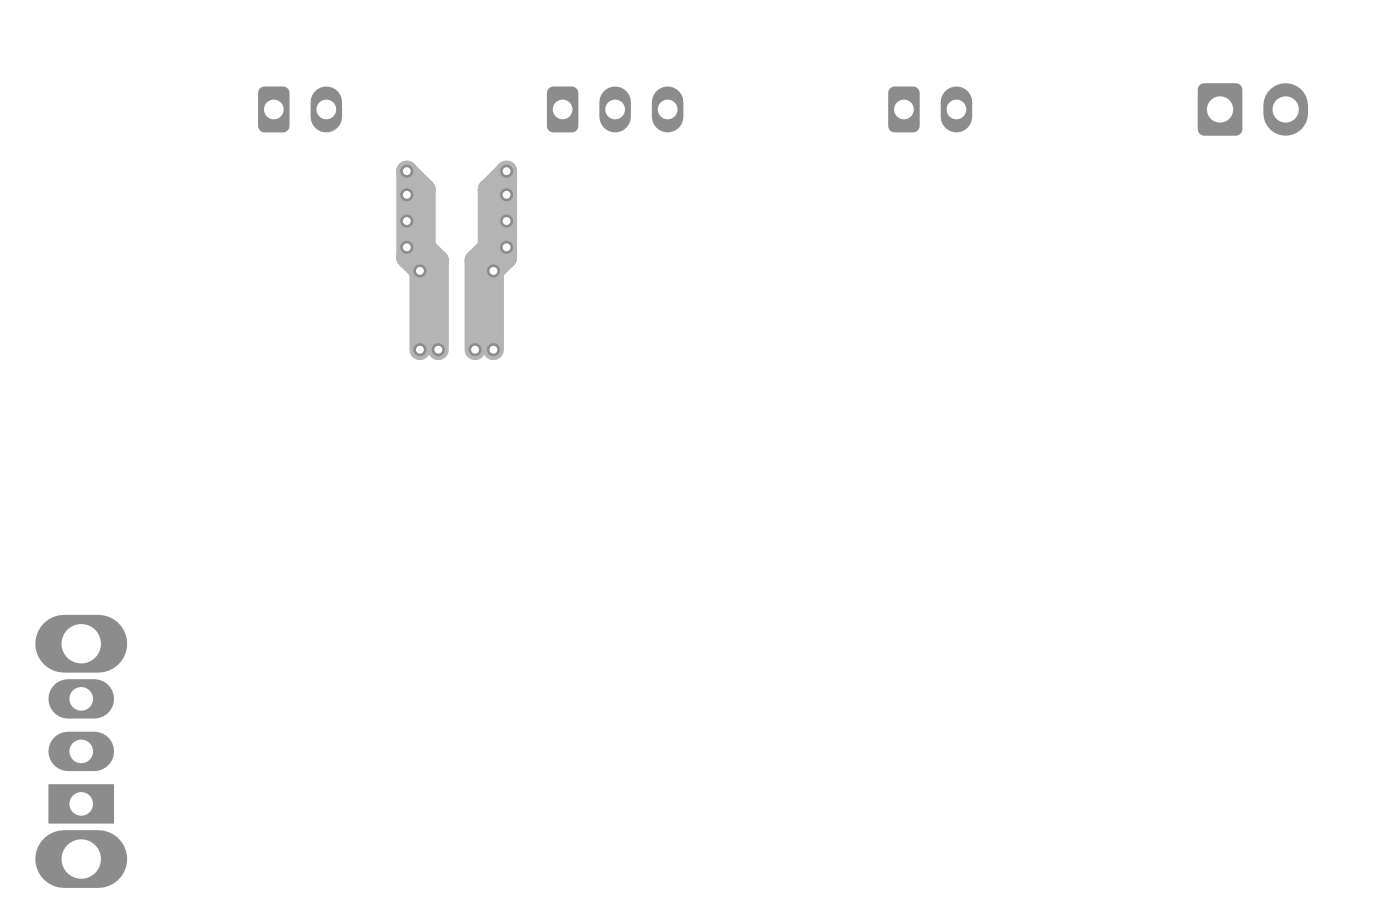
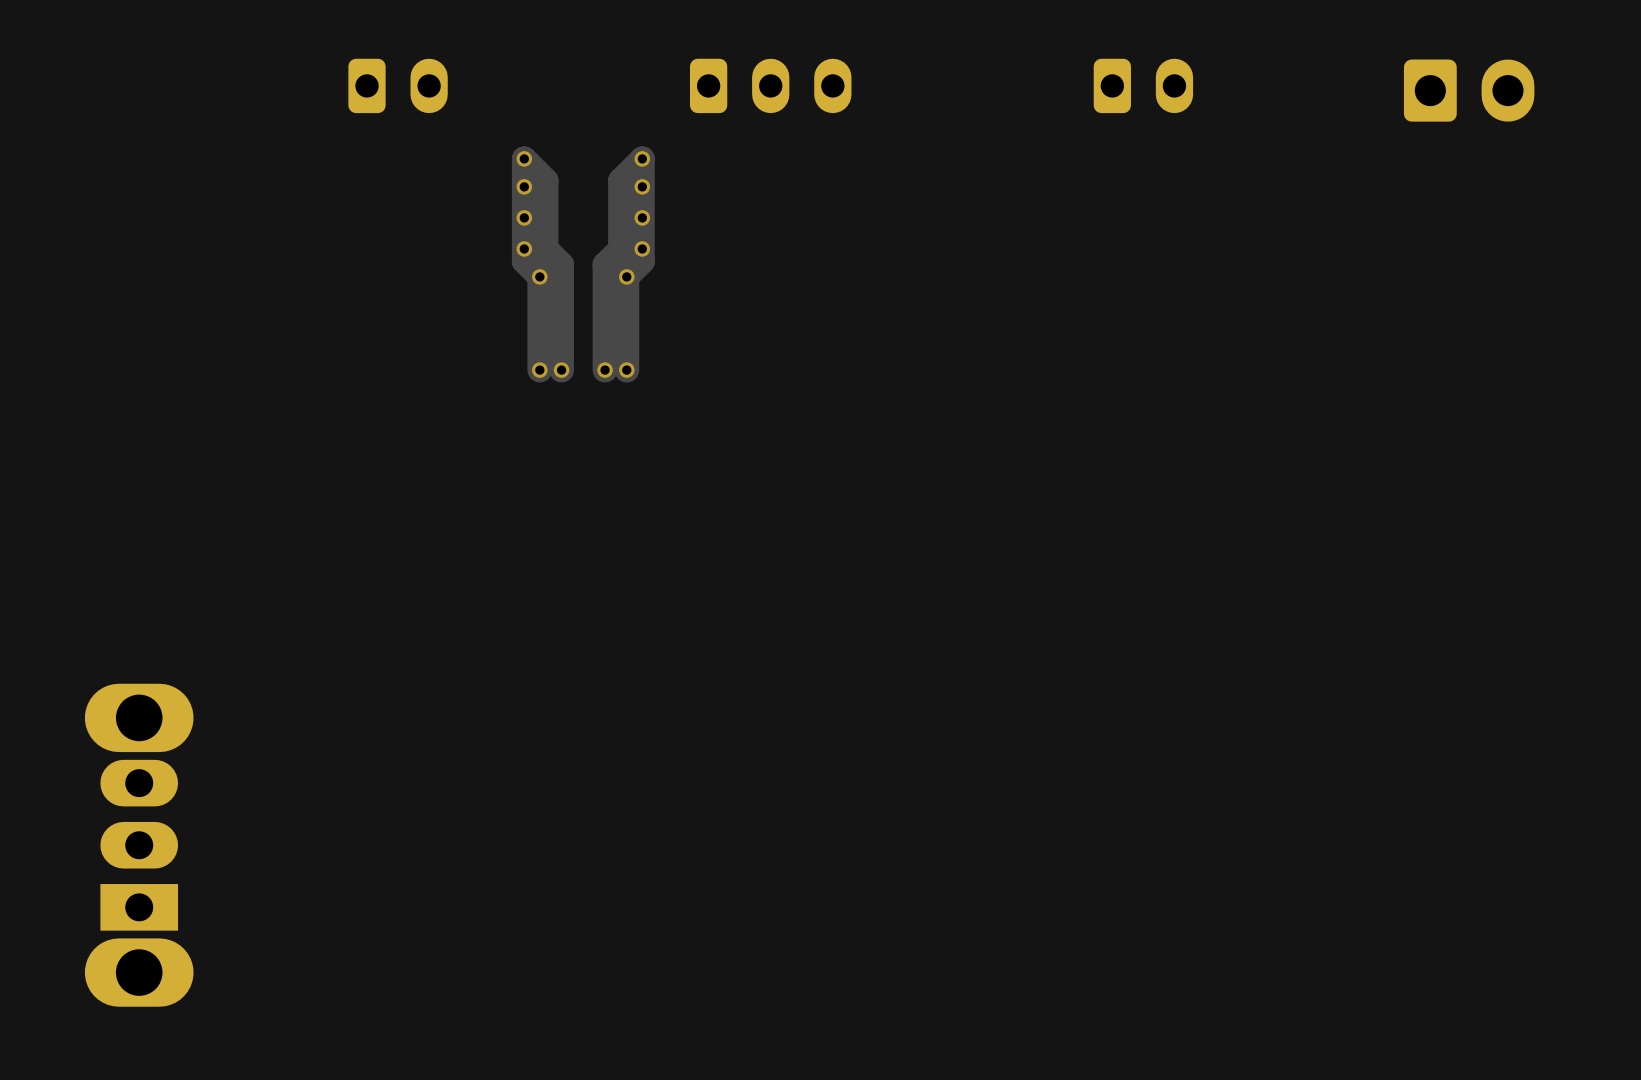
part position: (1252, 109) -> (1469, 90)

